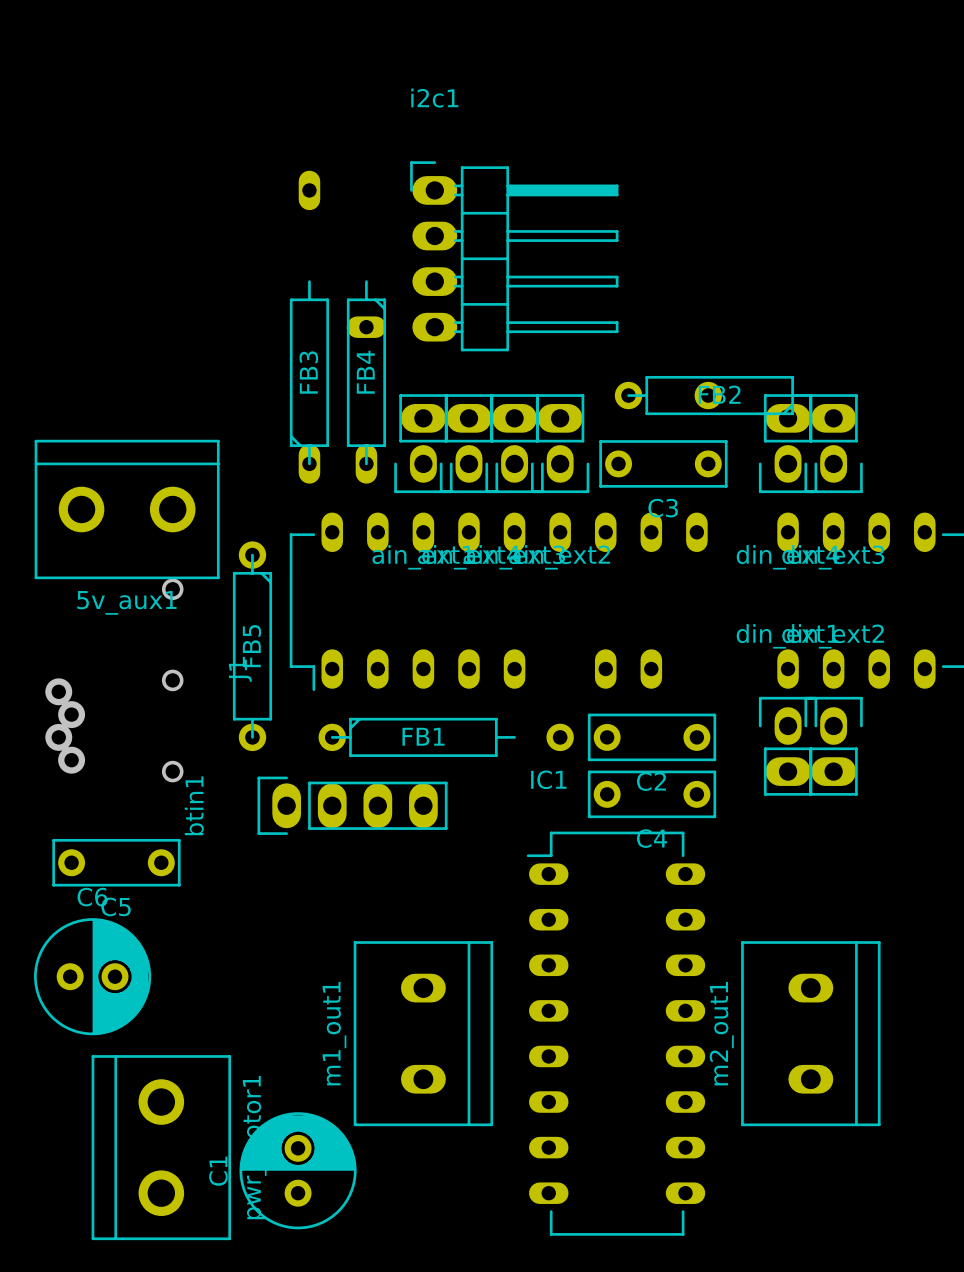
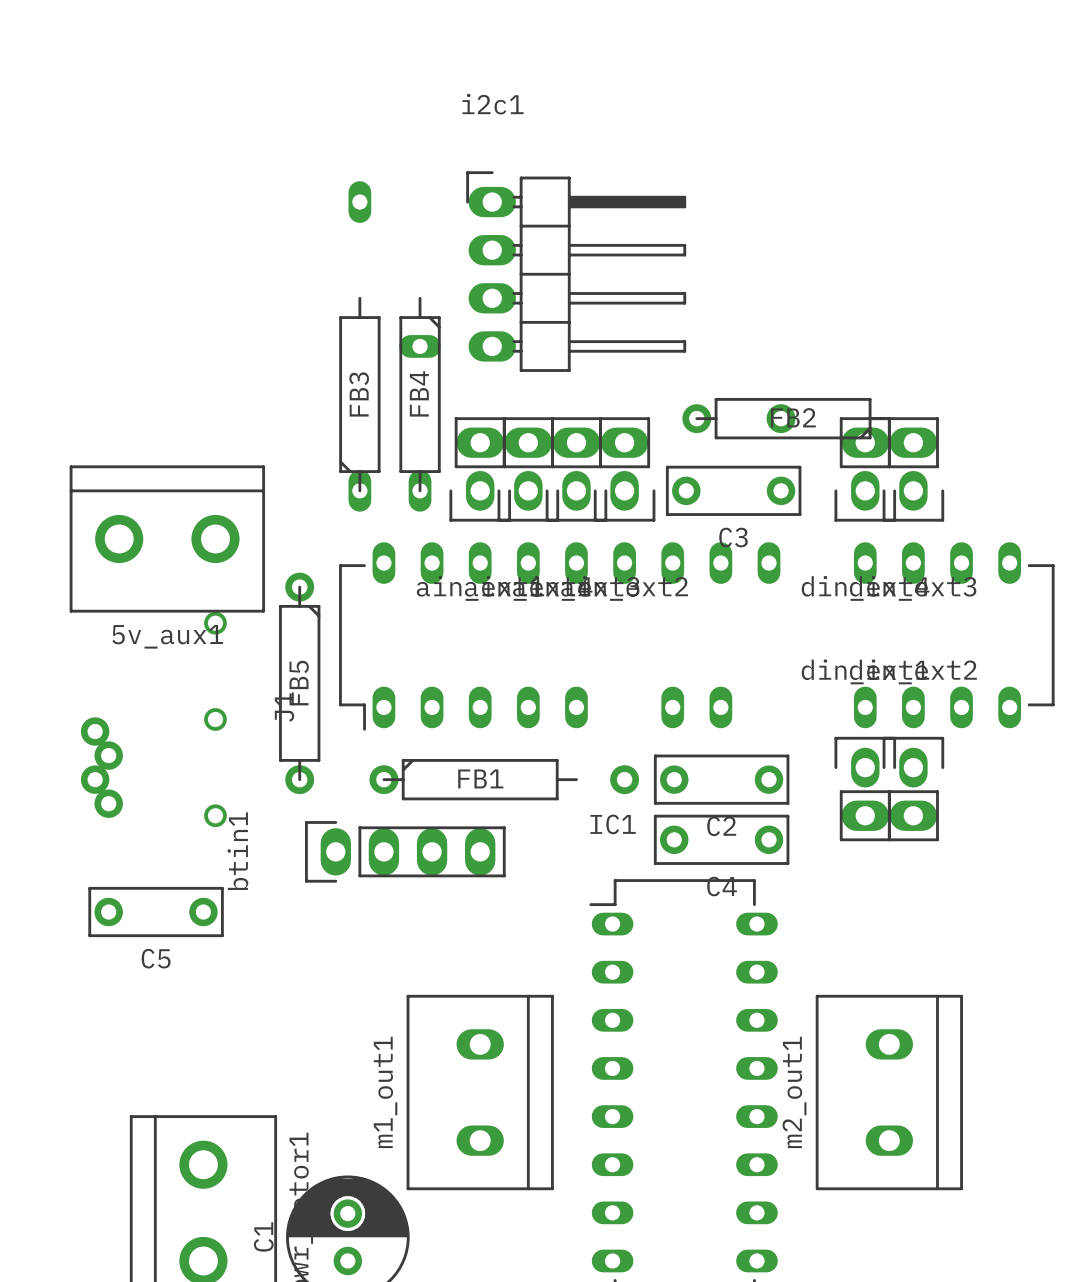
C6: (92, 976) -> none

